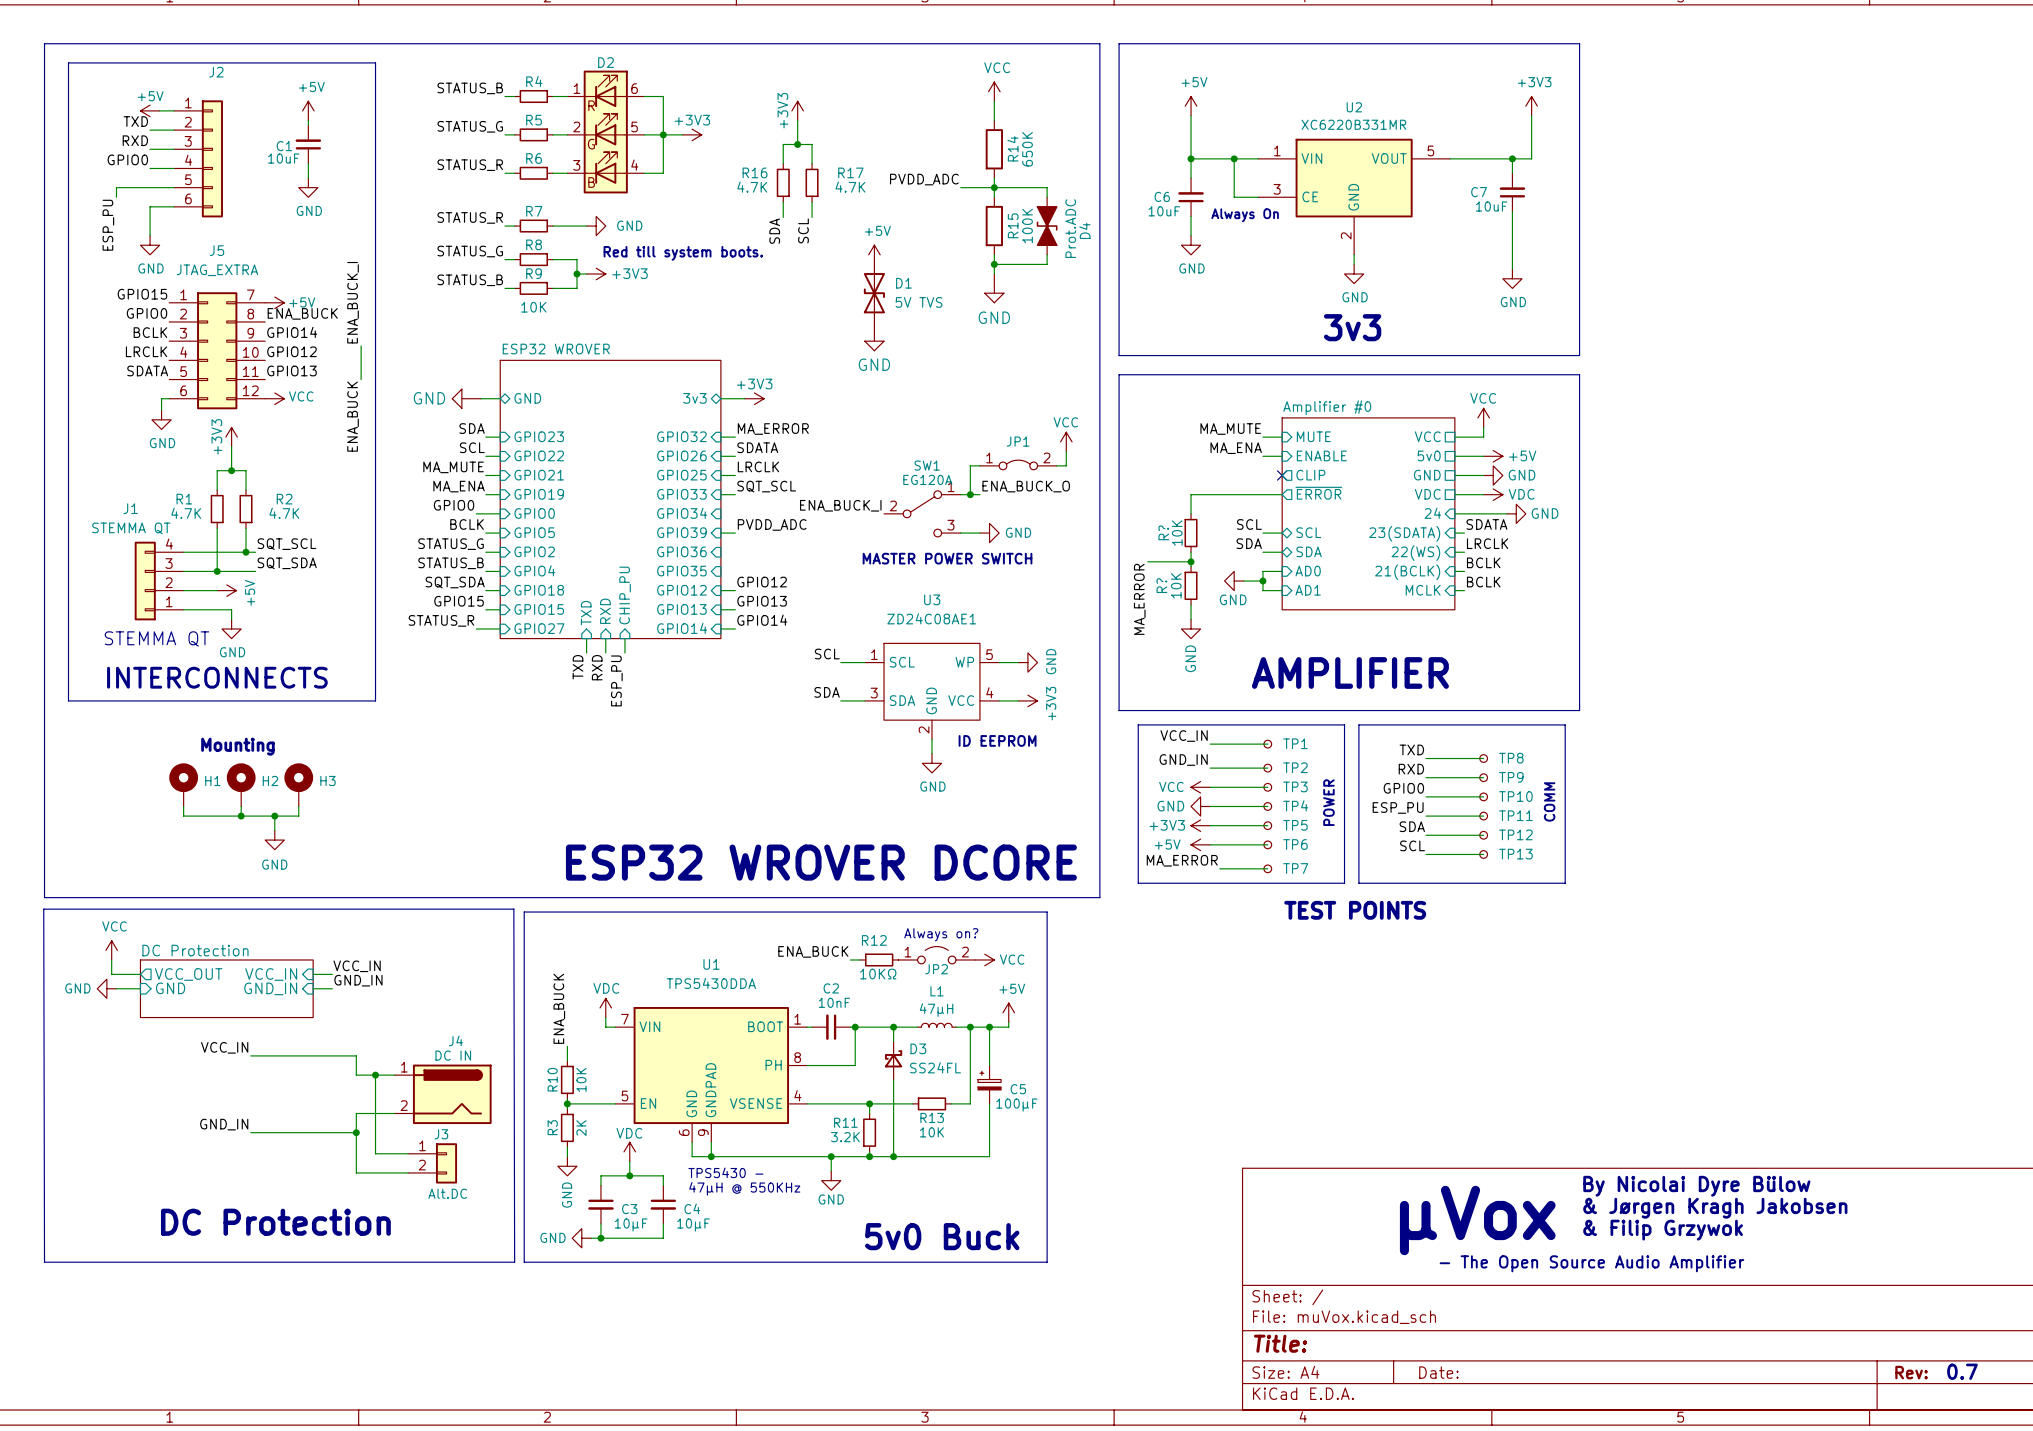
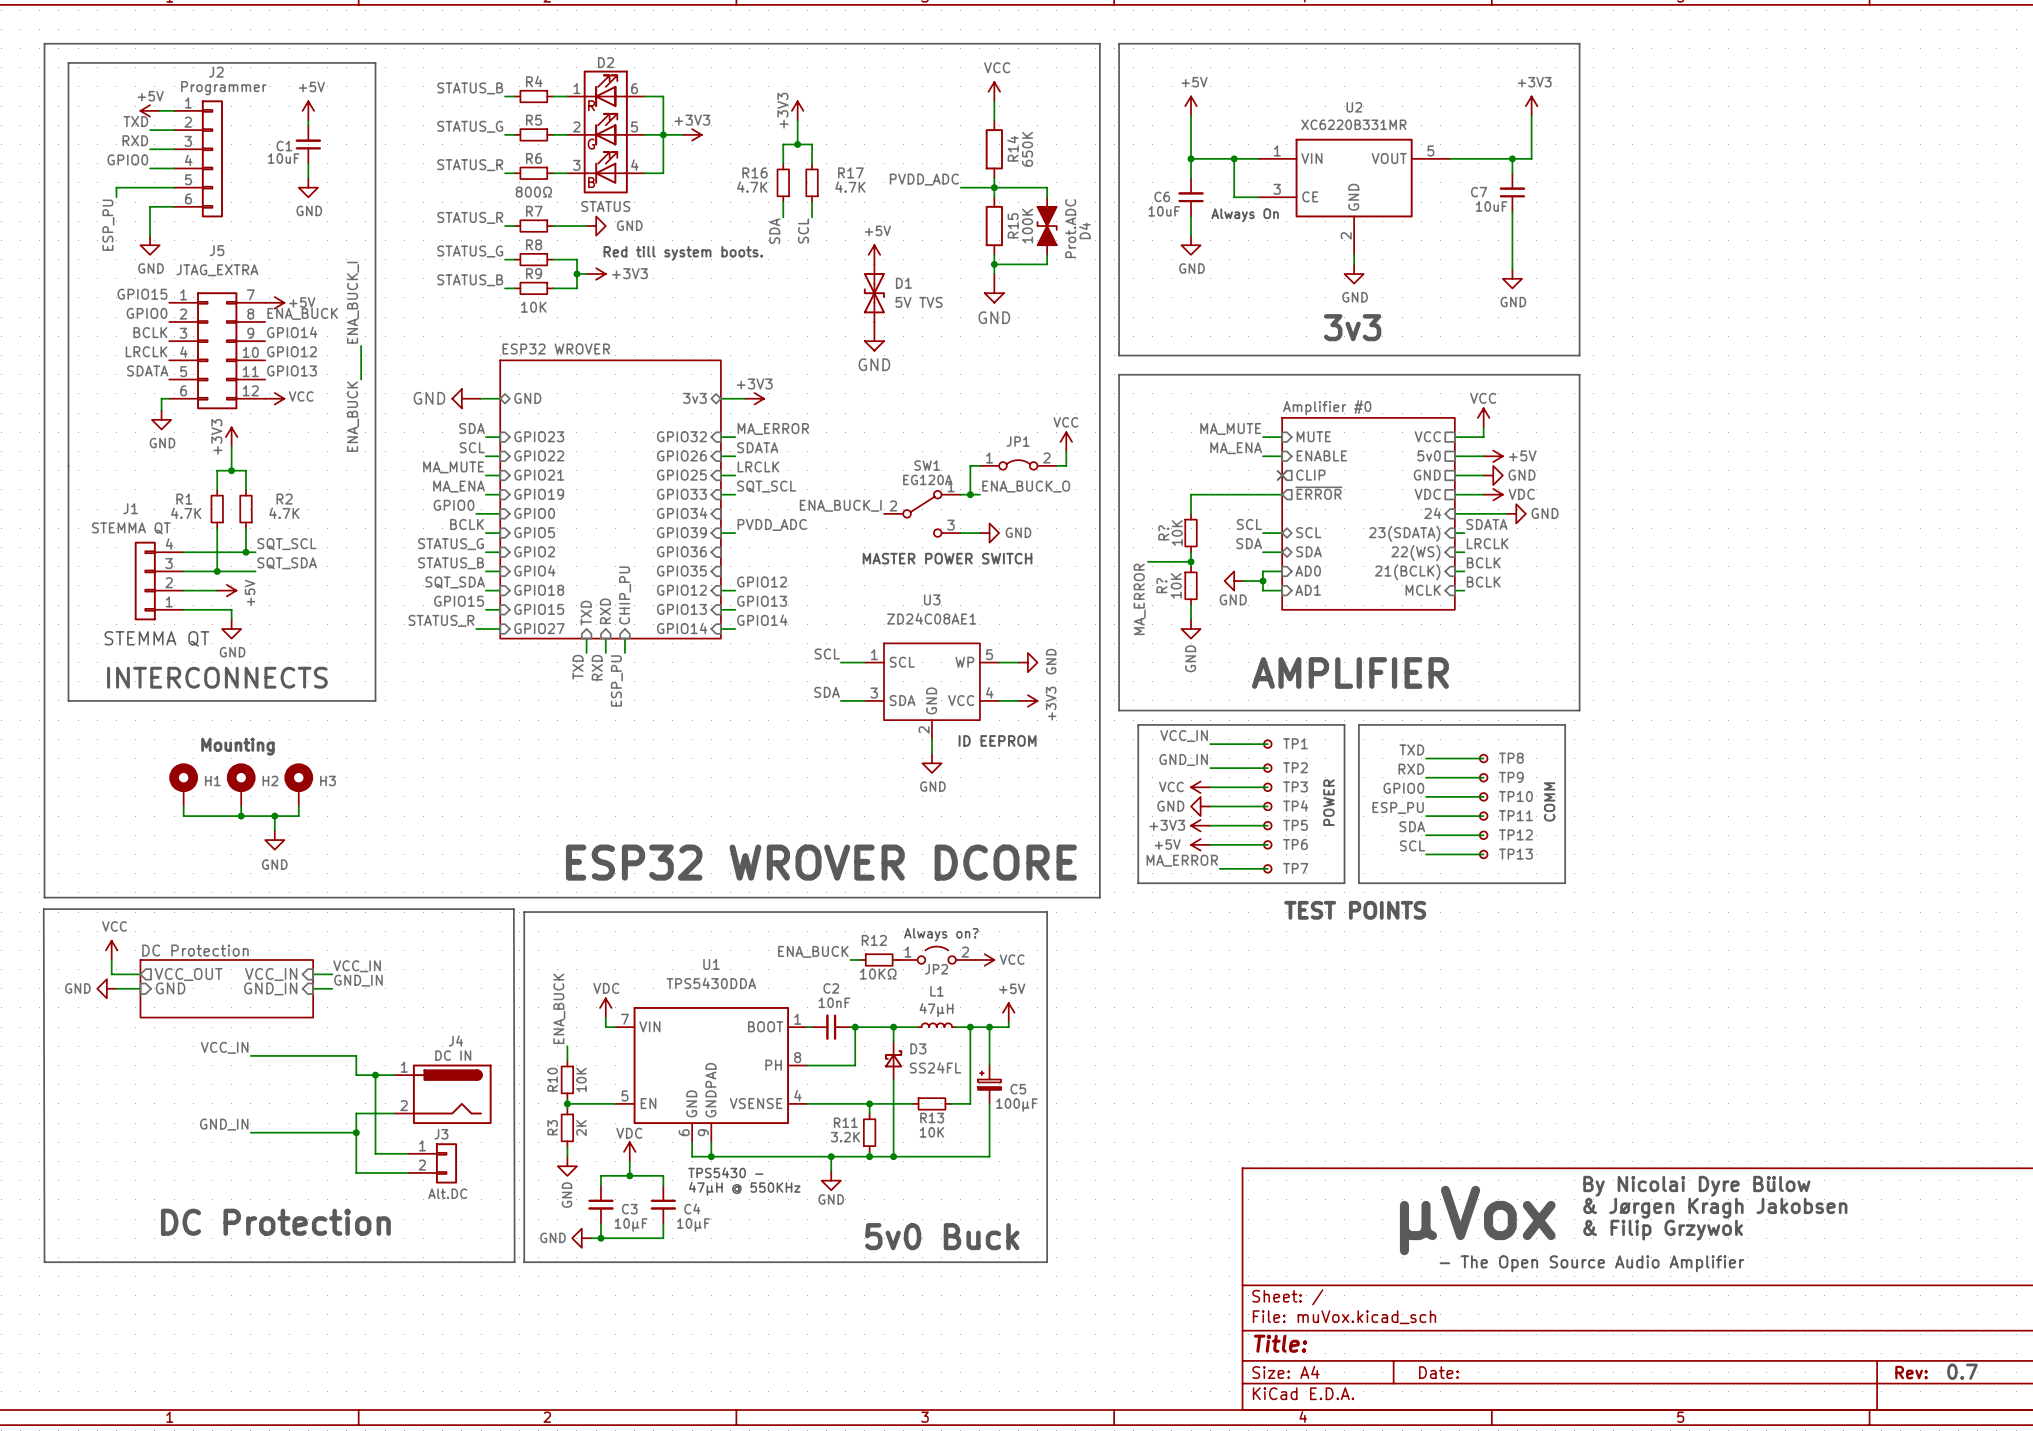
J2 value: none -> Programmer (223, 88)
R6 value: none -> 800Ω (533, 192)
D2 value: none -> STATUS (605, 206)

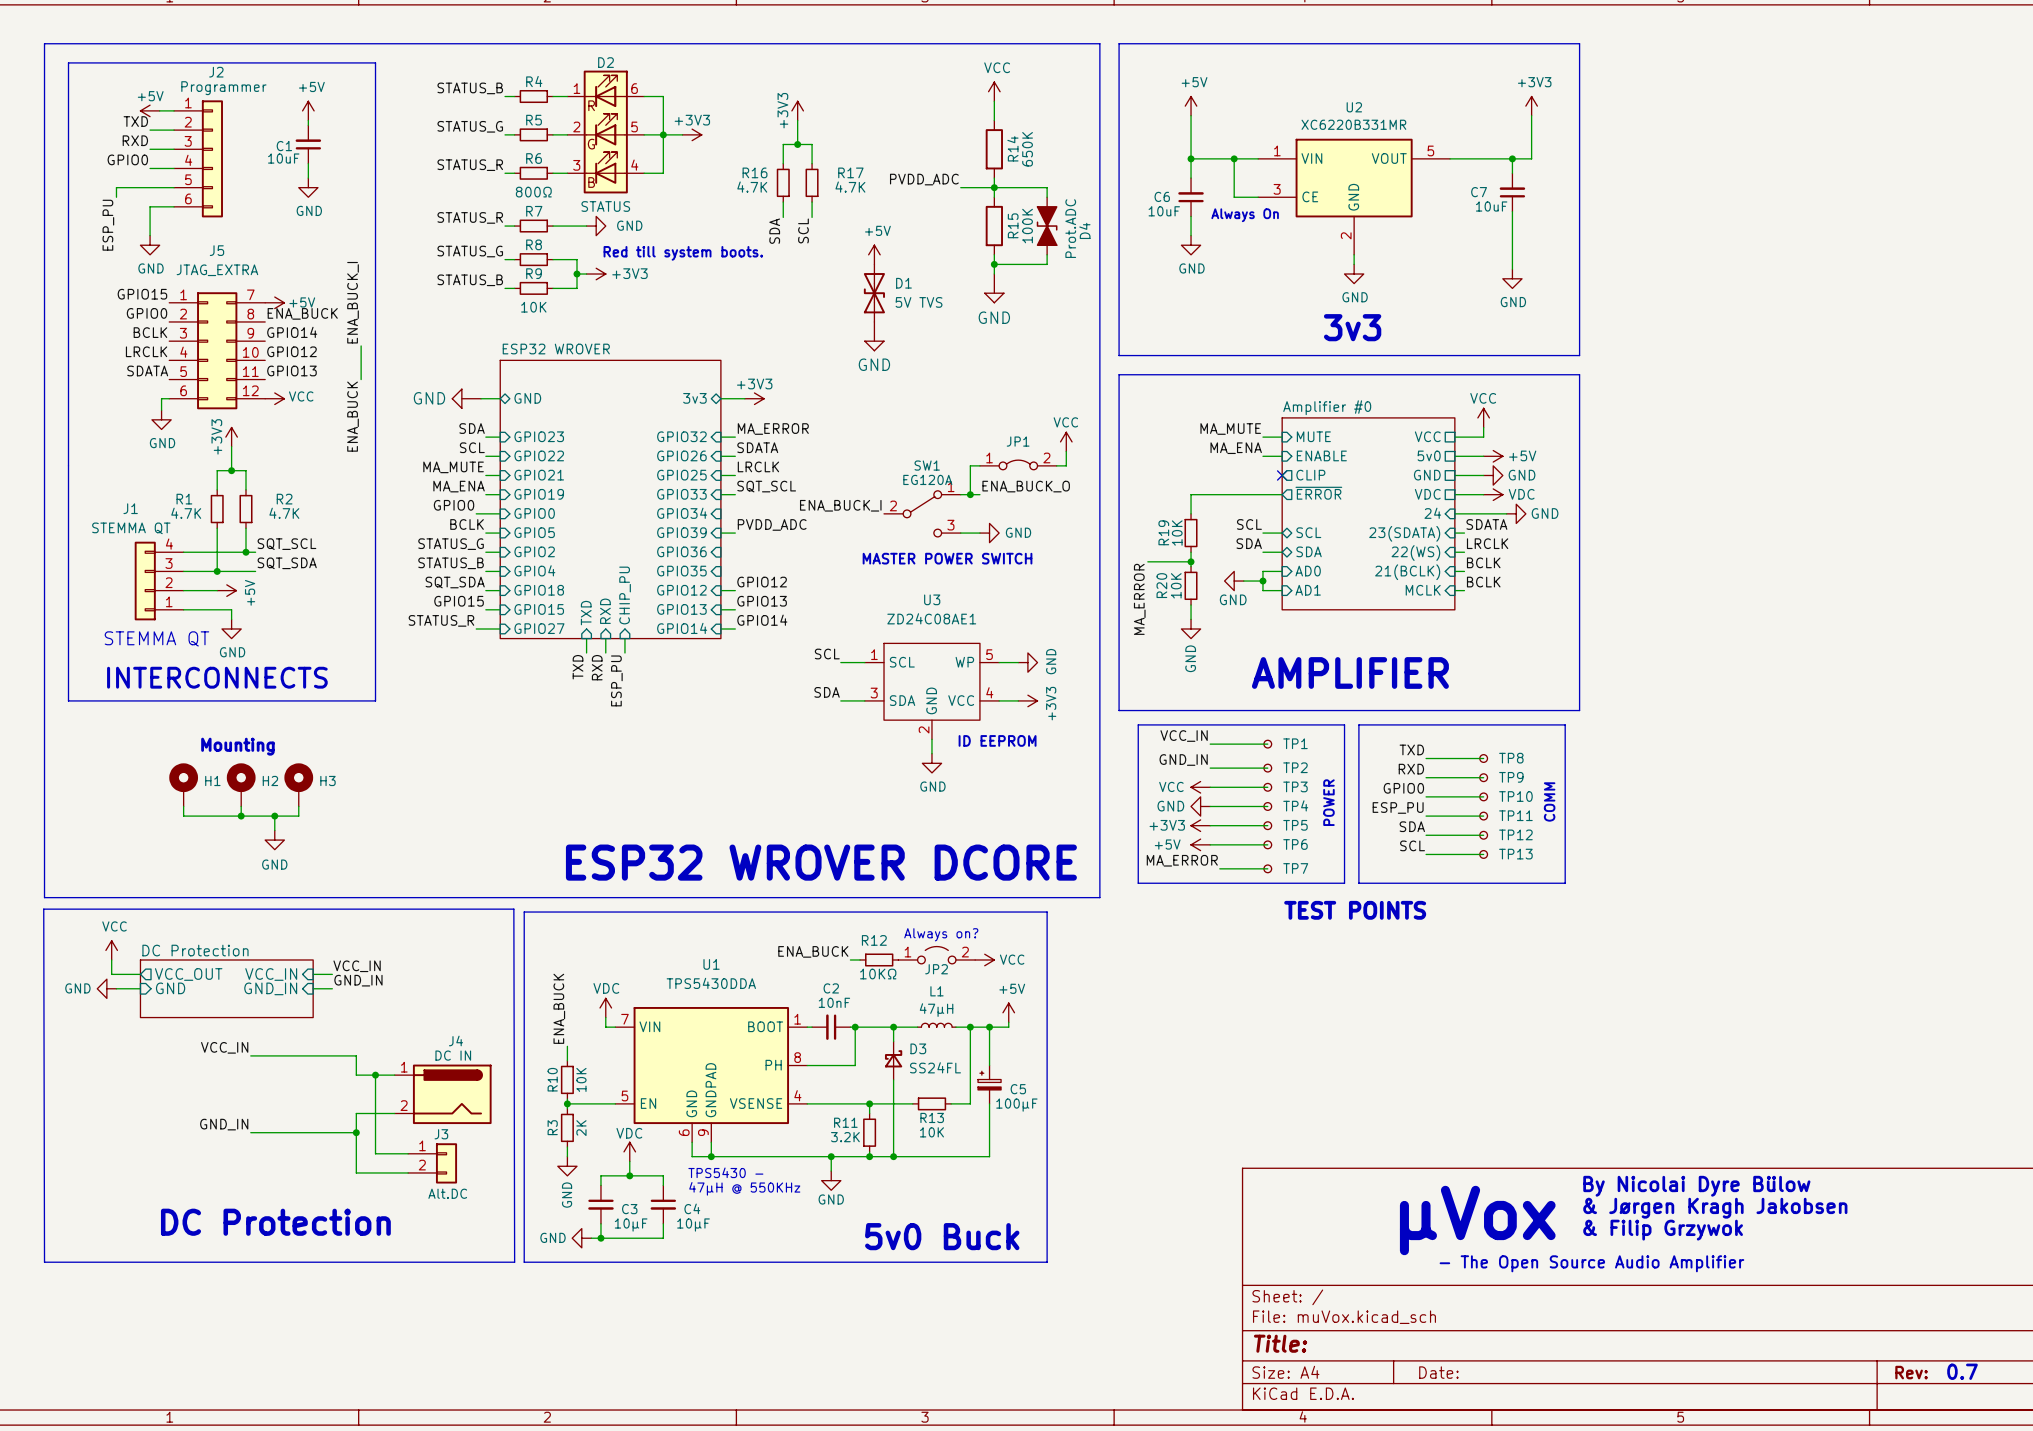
R? name: R? (1163, 532) -> R19 (1163, 532)
R? name: R? (1161, 585) -> R20 (1161, 585)

